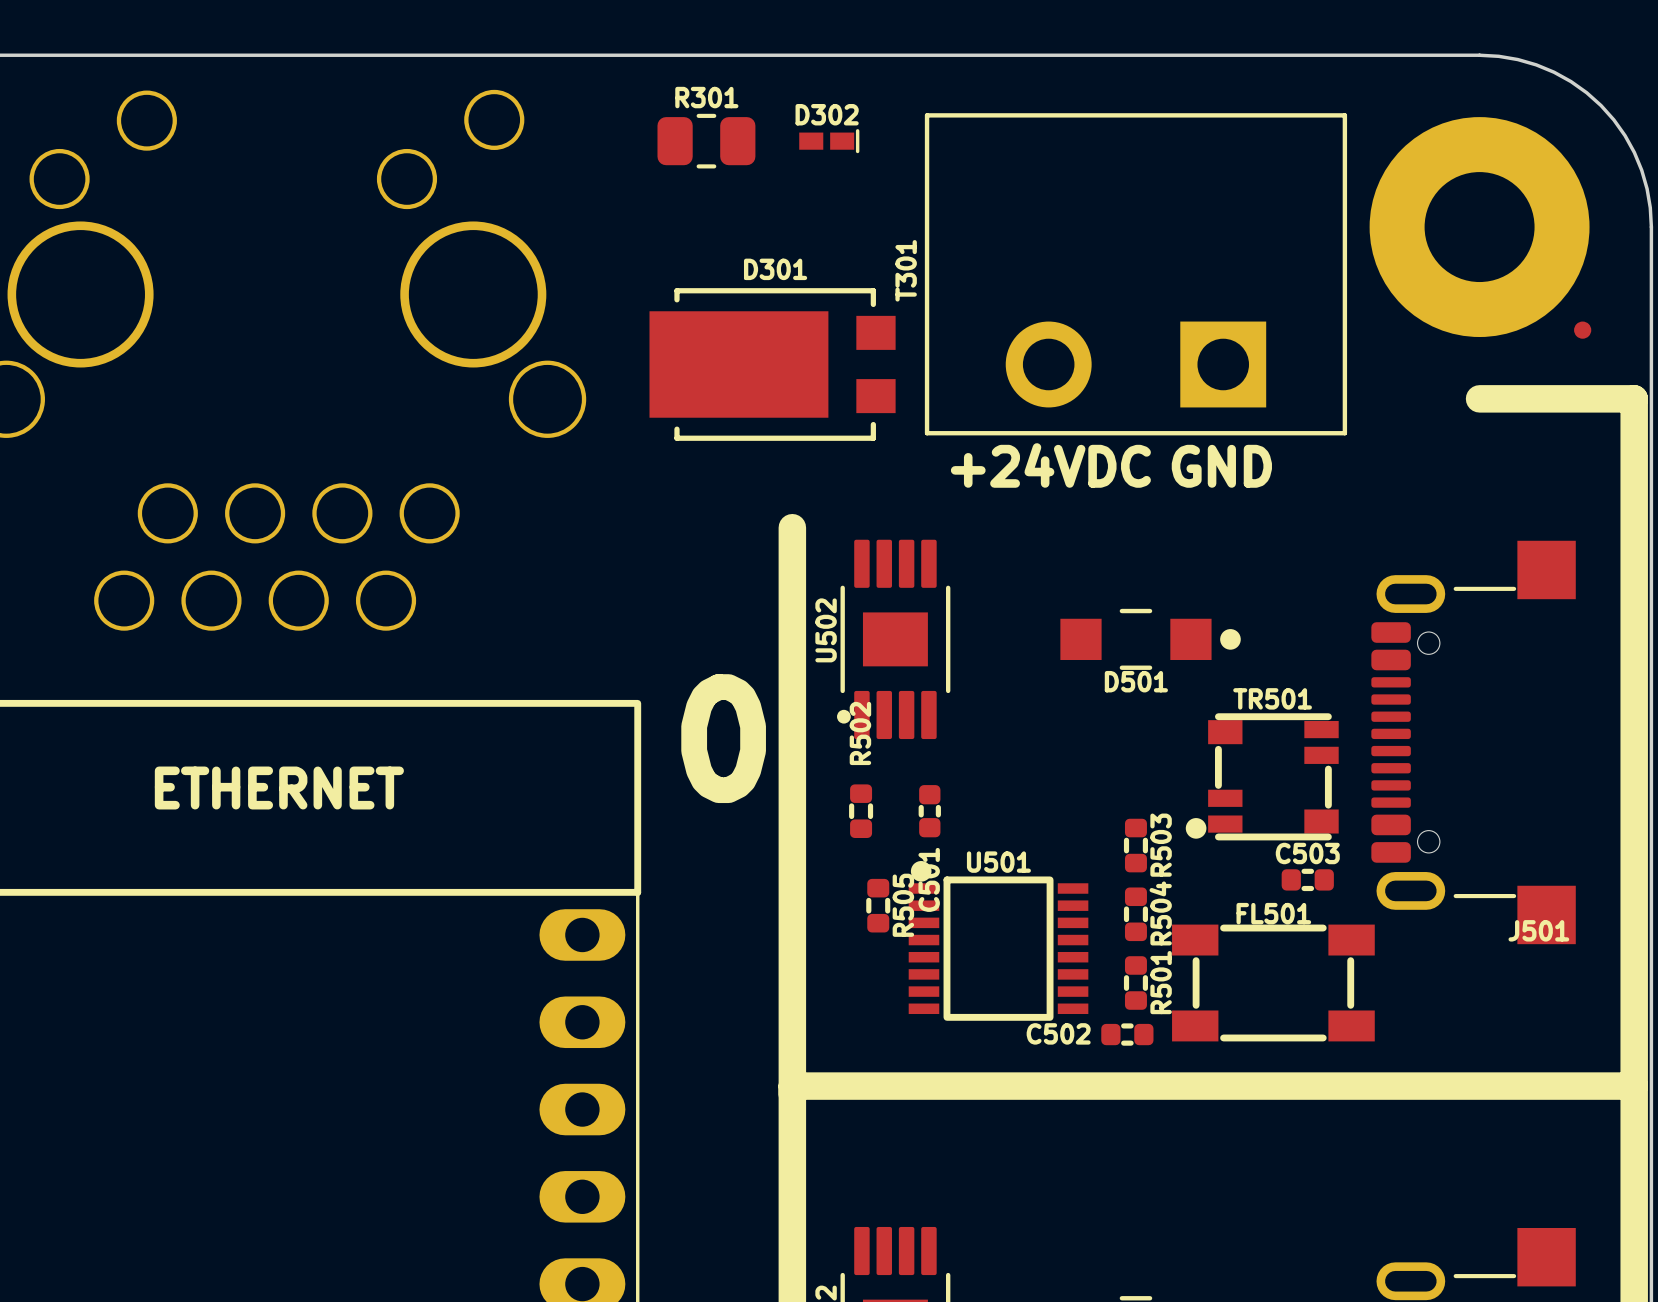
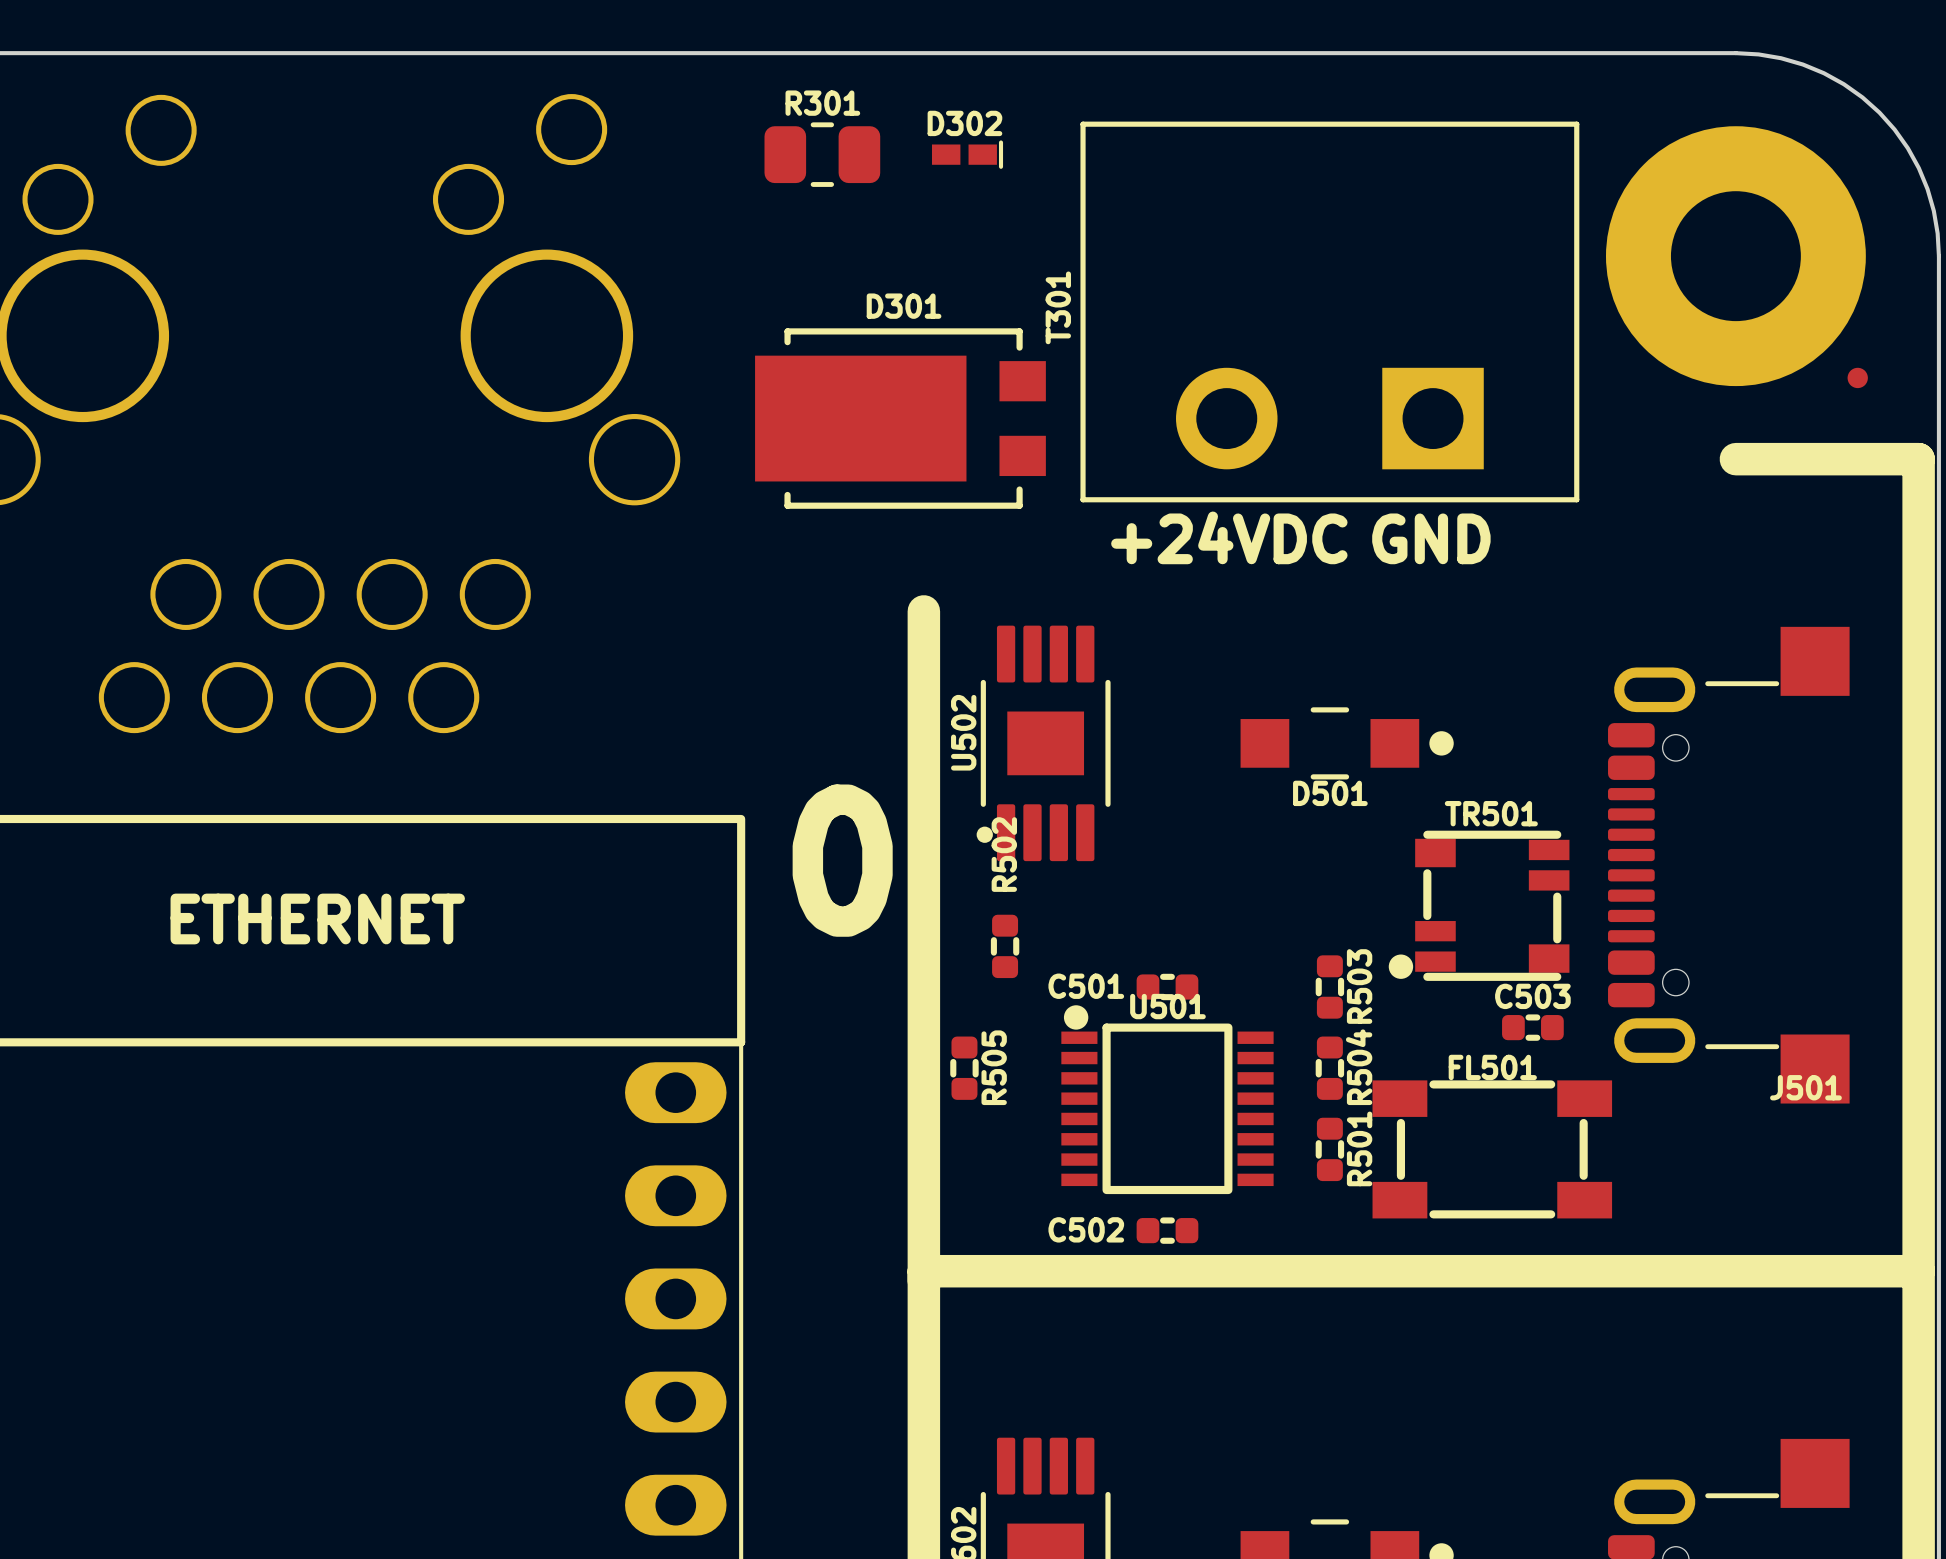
C501 rotation: 0° (929, 811) -> 90° clockwise (1167, 987)
C501 position: (929, 811) -> (1167, 987)
R505 position: (878, 905) -> (964, 1068)
C502 position: (1127, 1034) -> (1167, 1230)

